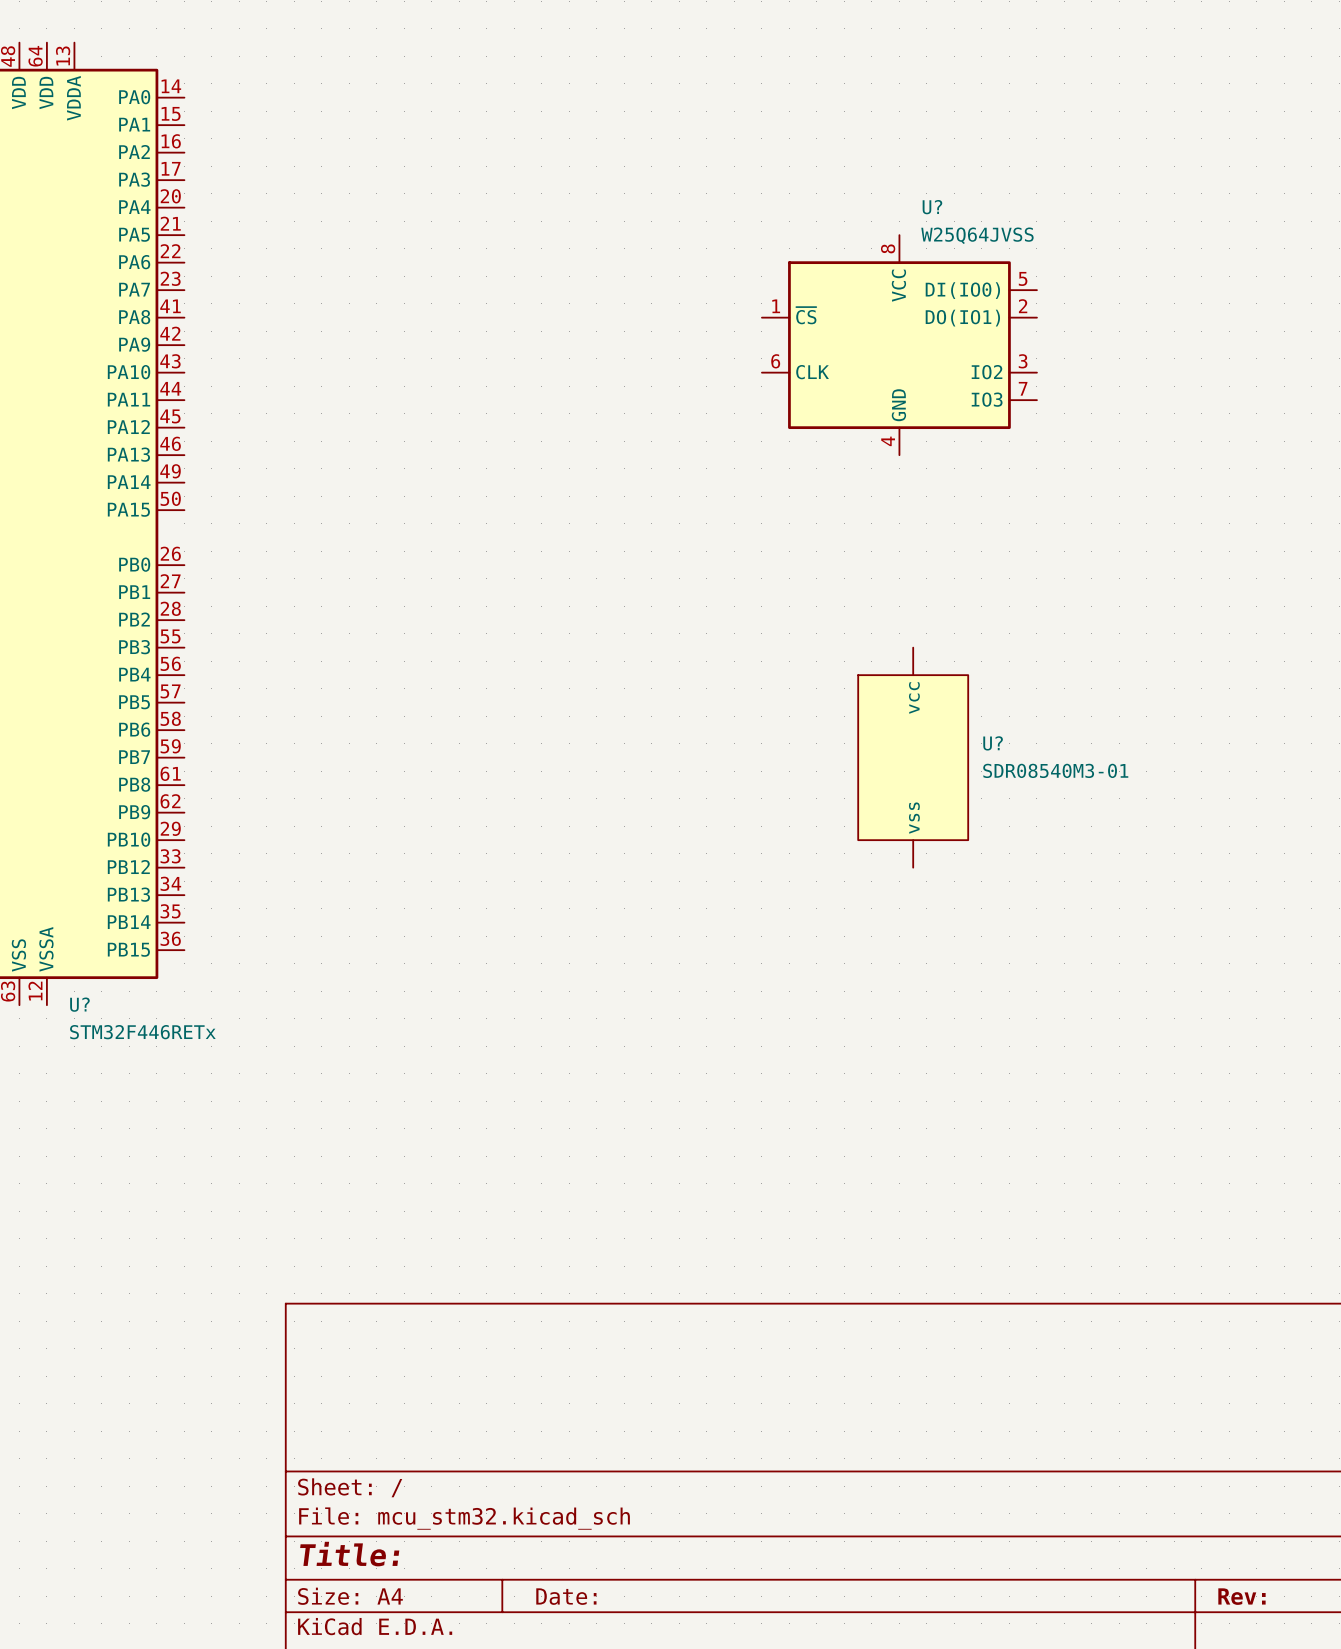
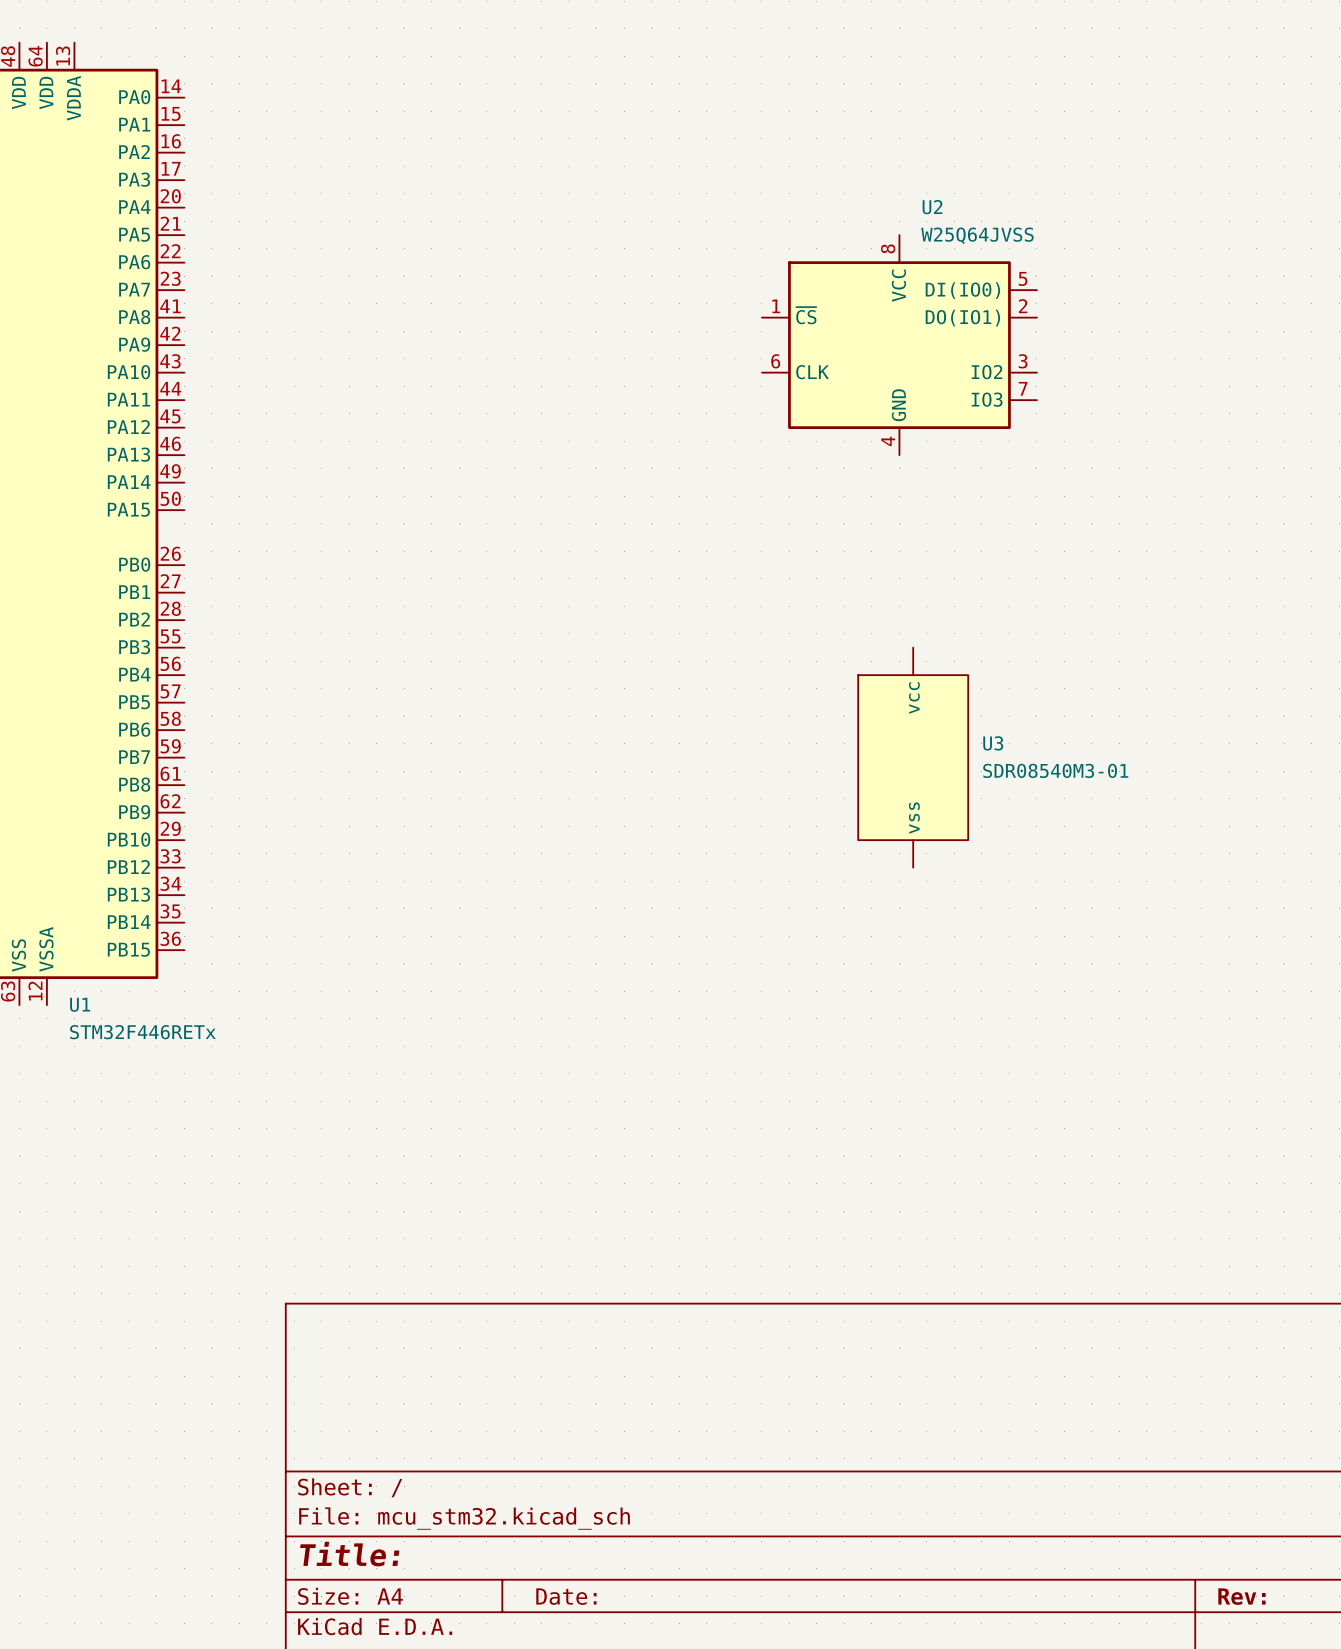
U? name: U? (932, 207) -> U2 (932, 207)
U? name: U? (993, 743) -> U3 (993, 743)
U? name: U? (79, 1004) -> U1 (80, 1004)

